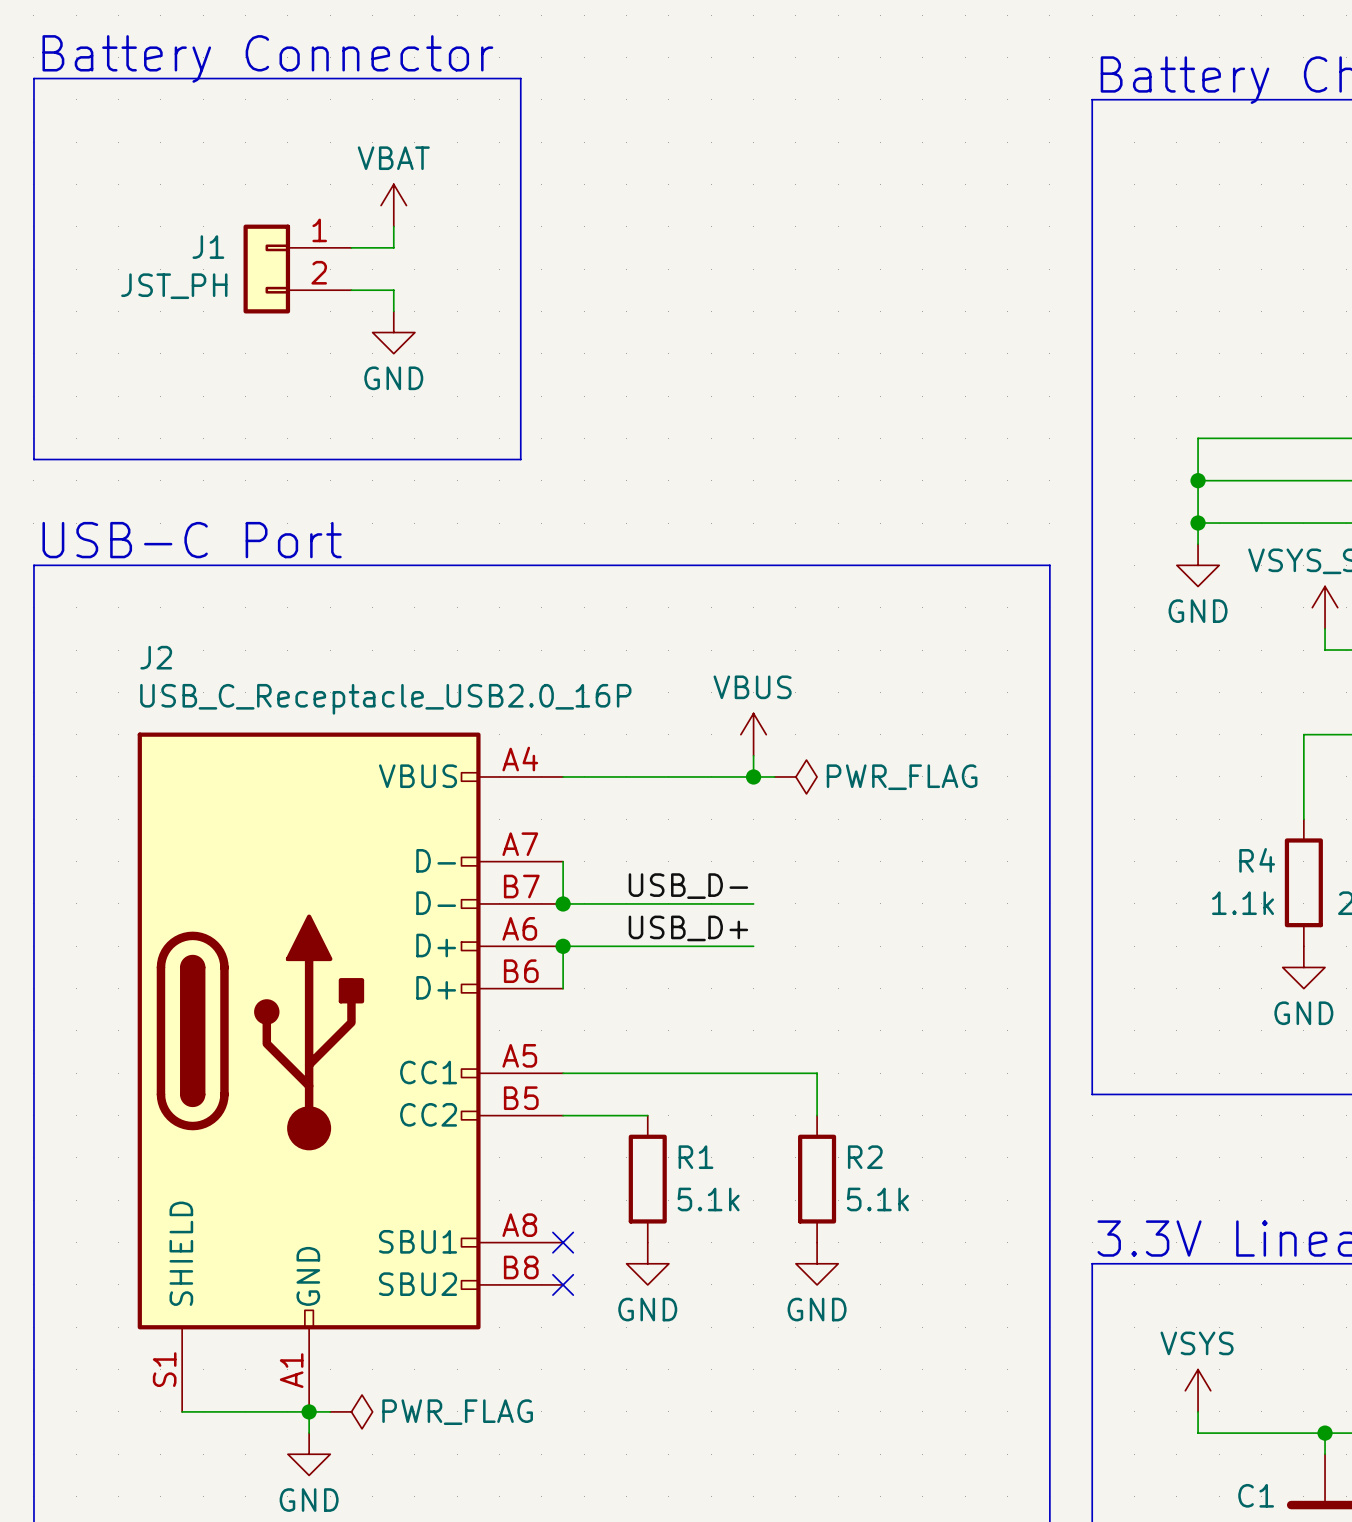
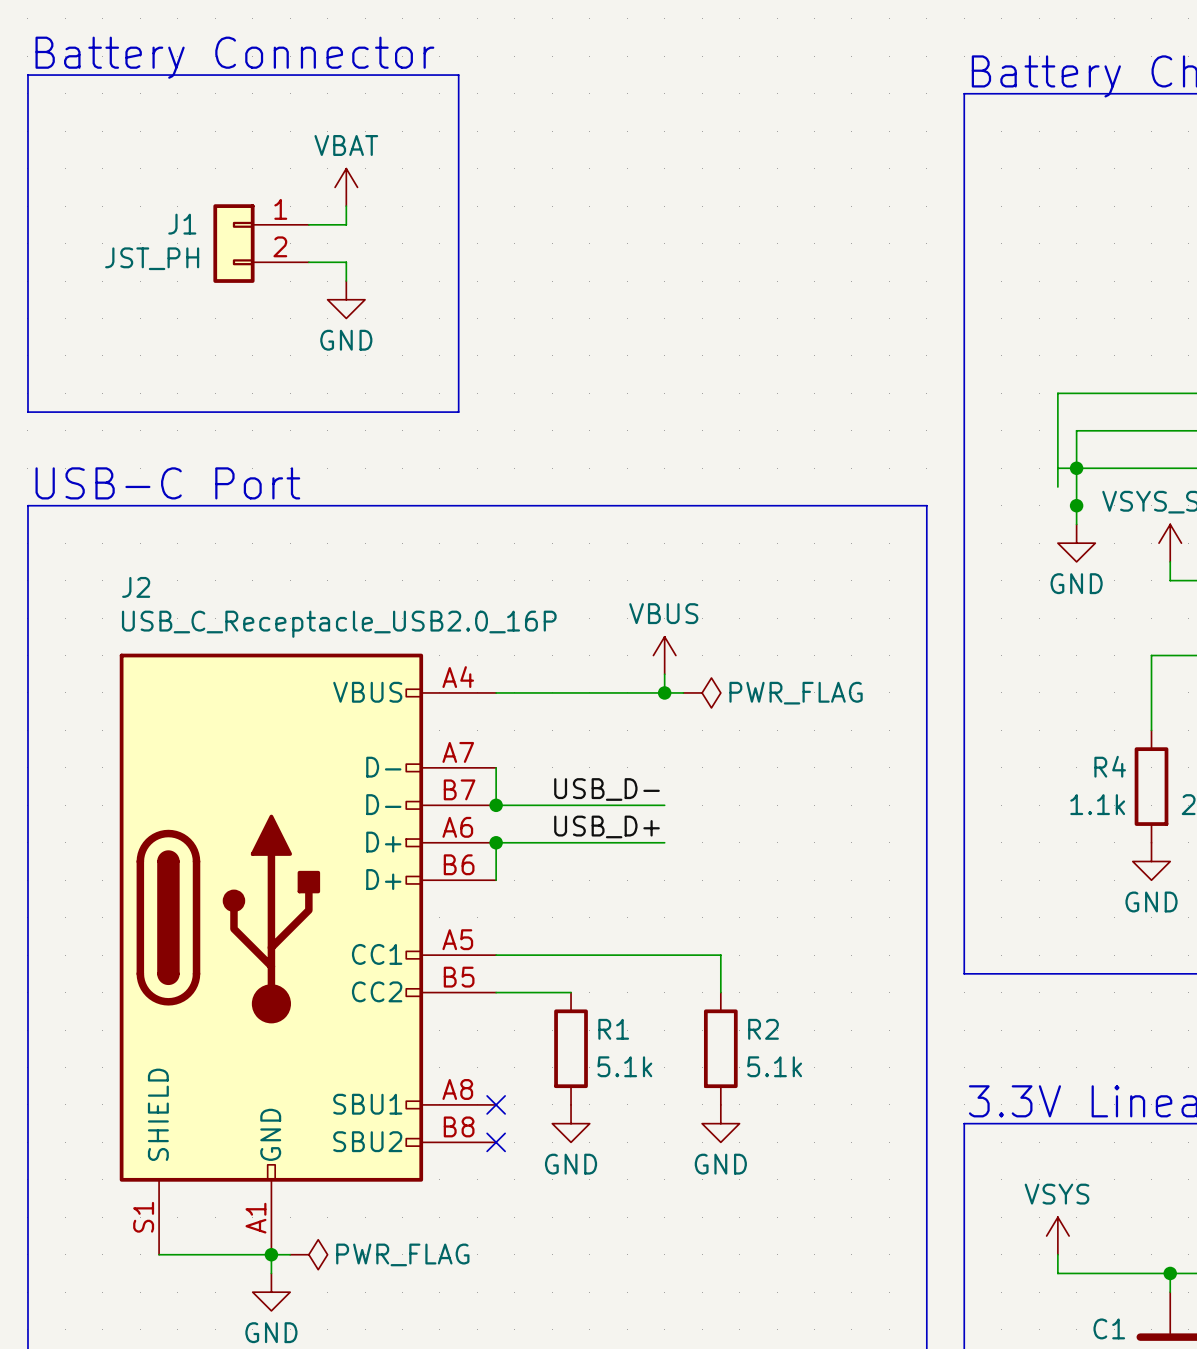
wire: (1198, 480) (1219, 480) -> (1076, 524) (1076, 430)
junction: (1198, 480) -> none
junction position: (1198, 523) -> (1076, 468)
power symbol position: GND (1198, 565) -> GND (1076, 543)
junction: none -> (1076, 505)

